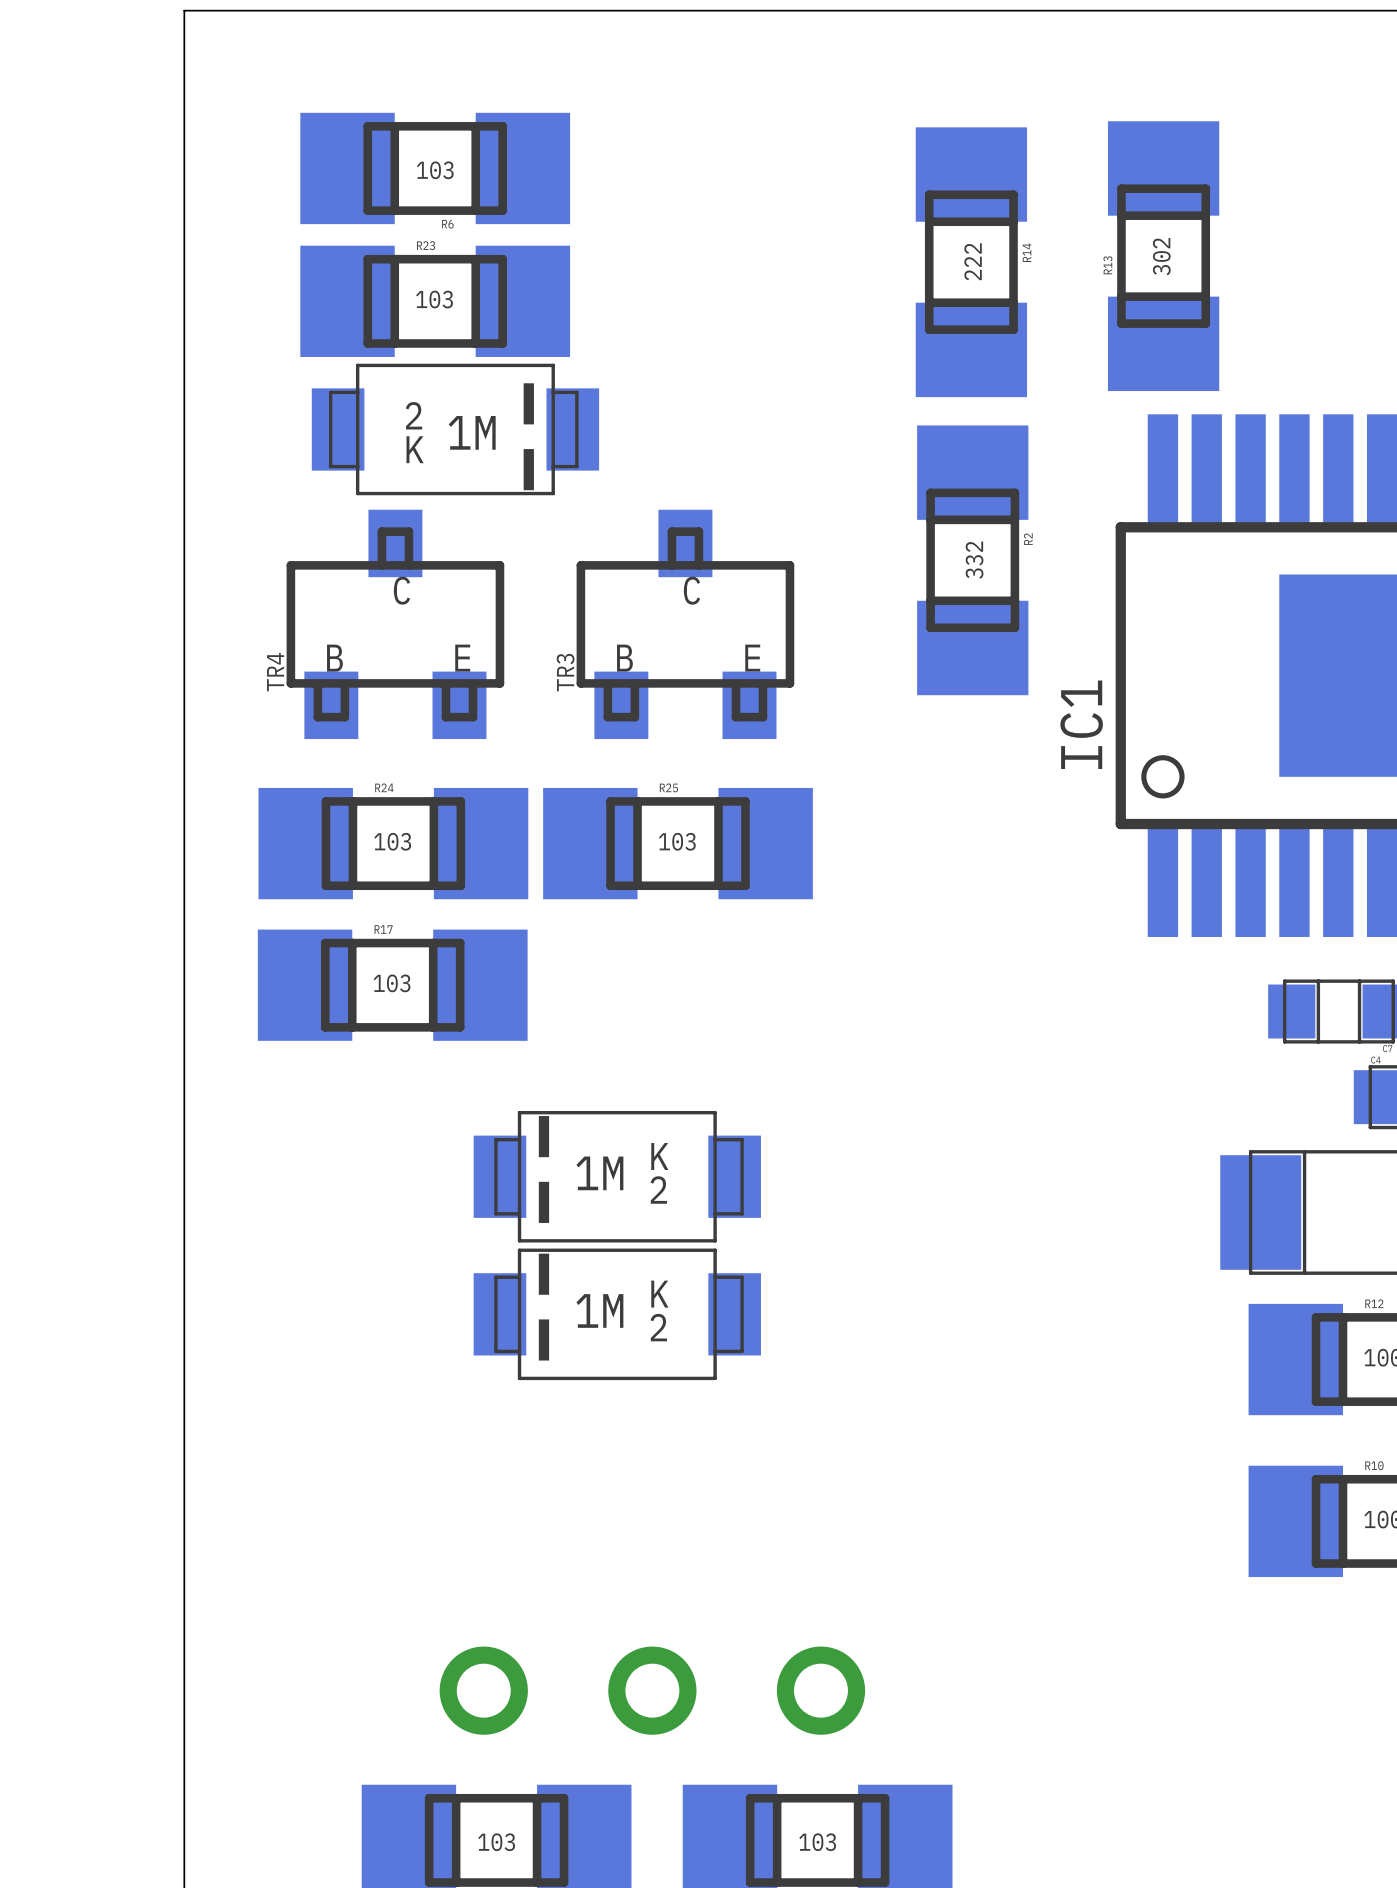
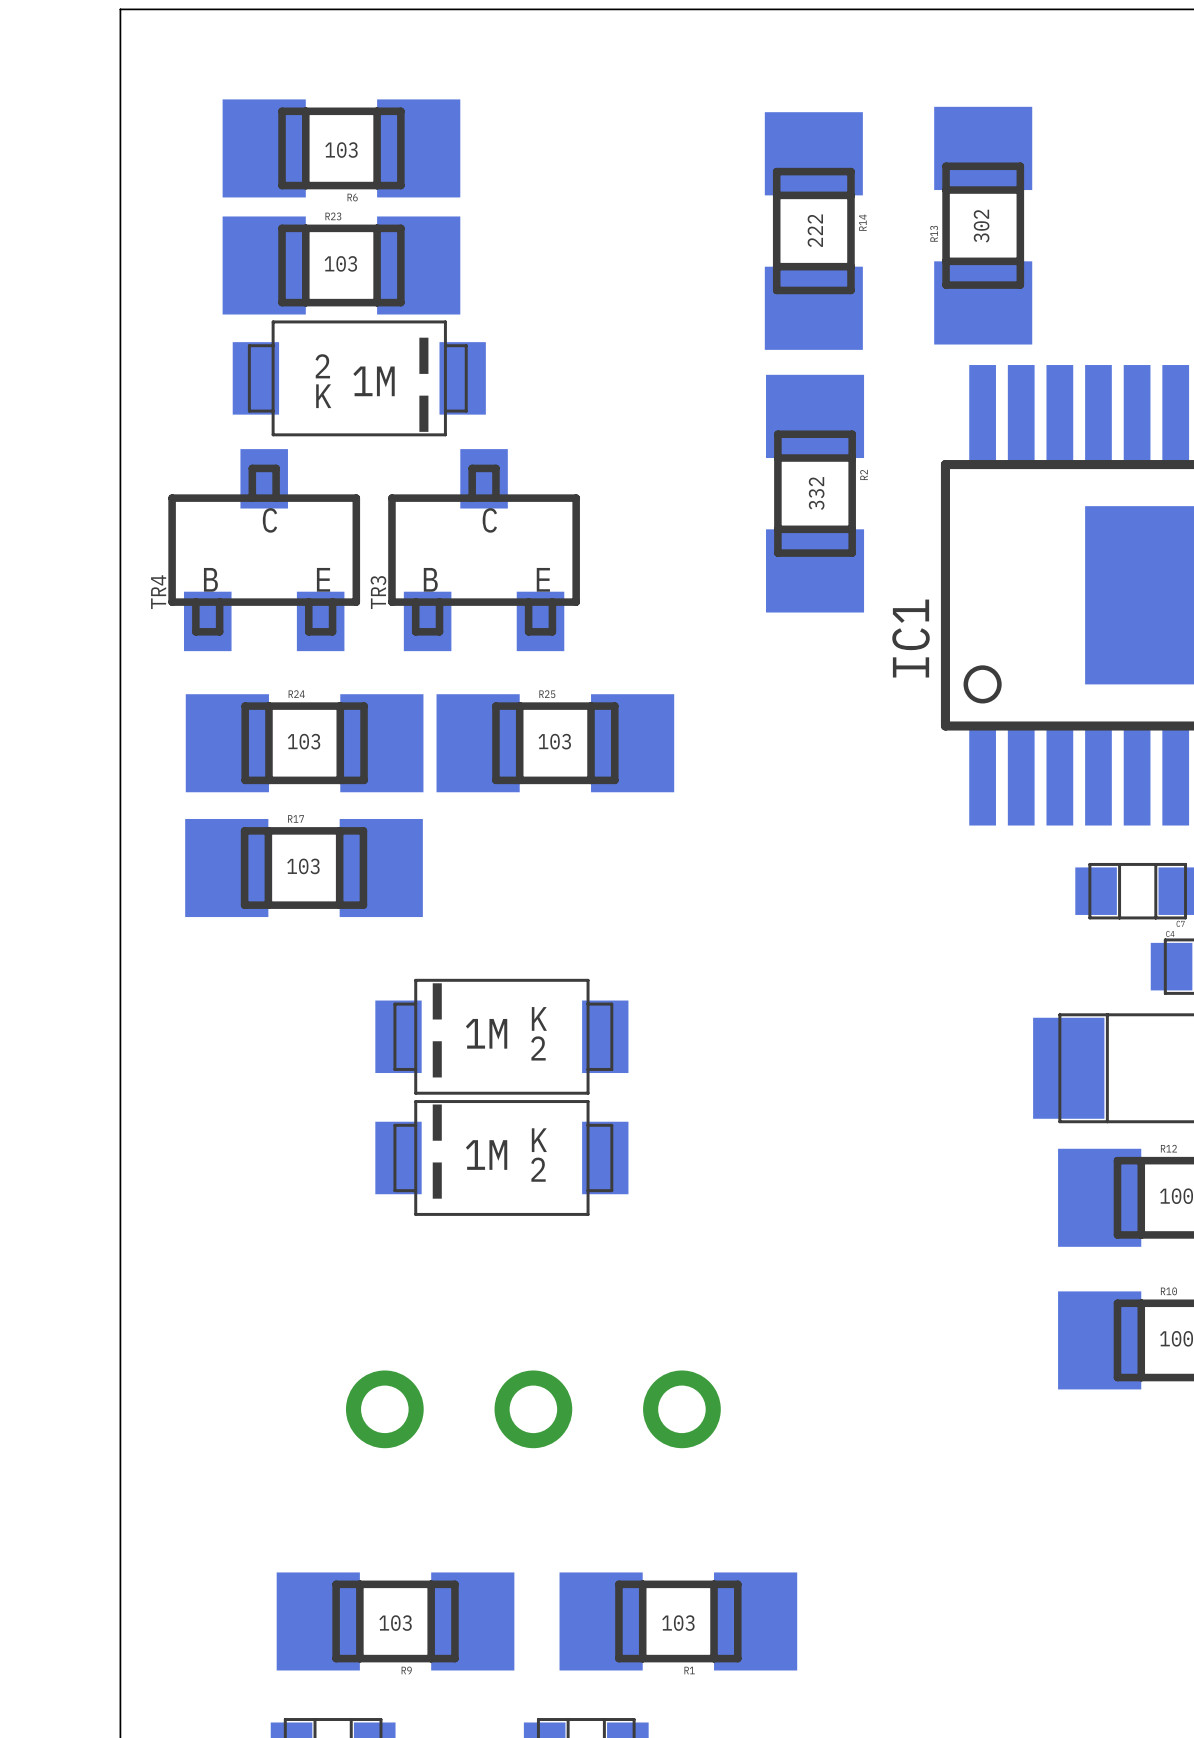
TR4 position: (395, 624) -> (264, 550)
TR3 position: (685, 624) -> (484, 550)
part position: (652, 1690) -> (533, 1409)

